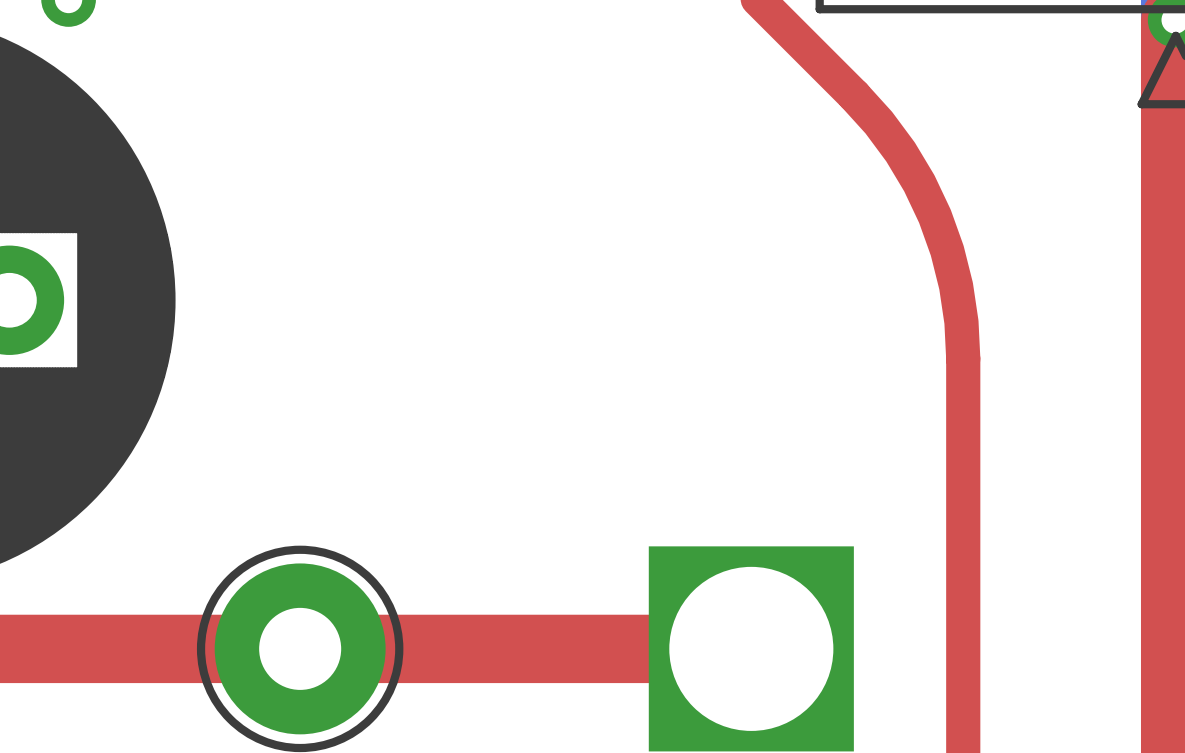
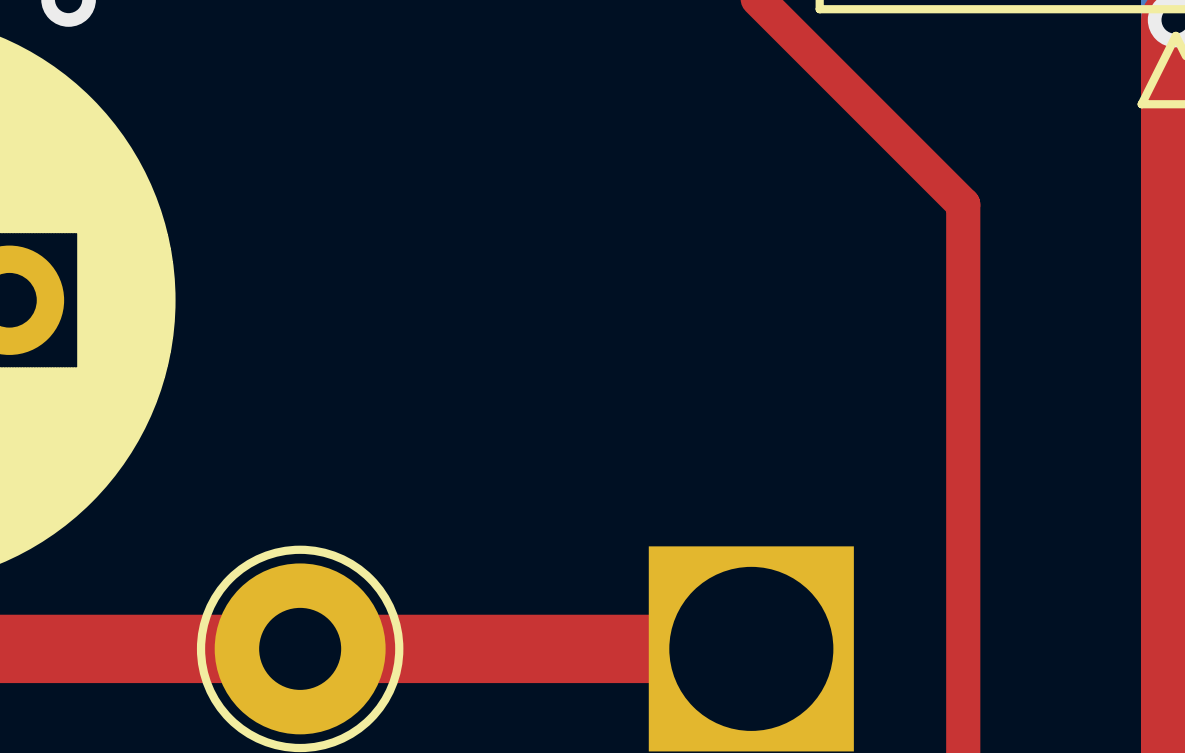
top track: (854, 95) (878, 122) (900, 151) (919, 183) (934, 216) (947, 250) (956, 286) (961, 322) (963, 358) -> (854, 95) (963, 204) (963, 358)

